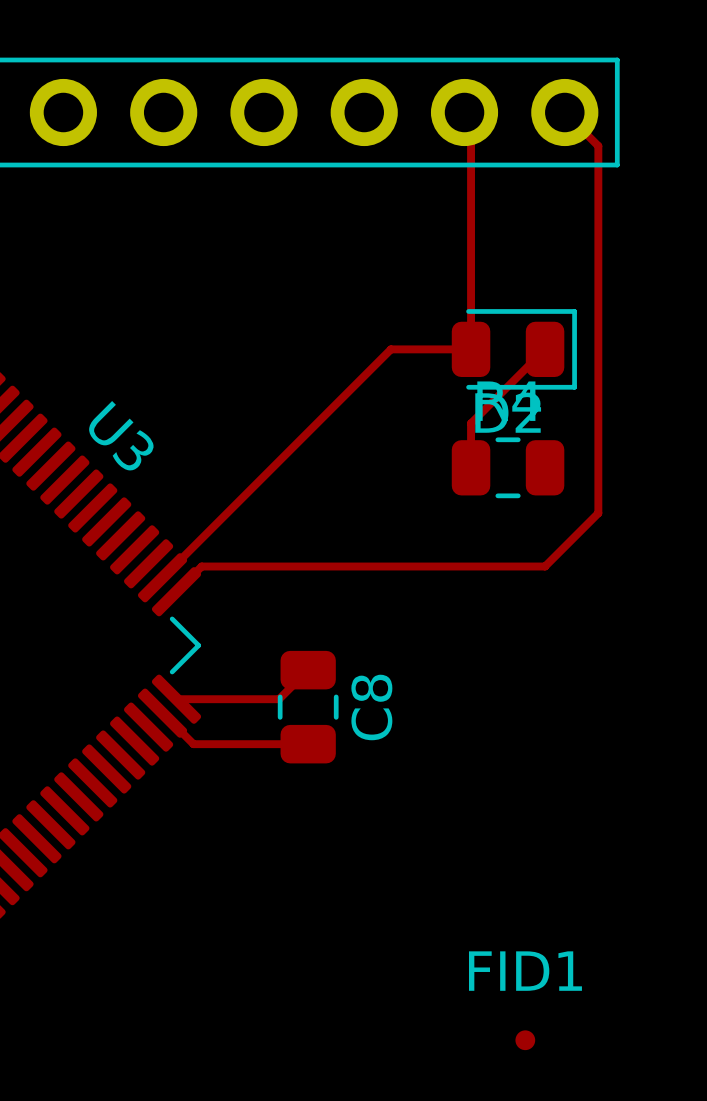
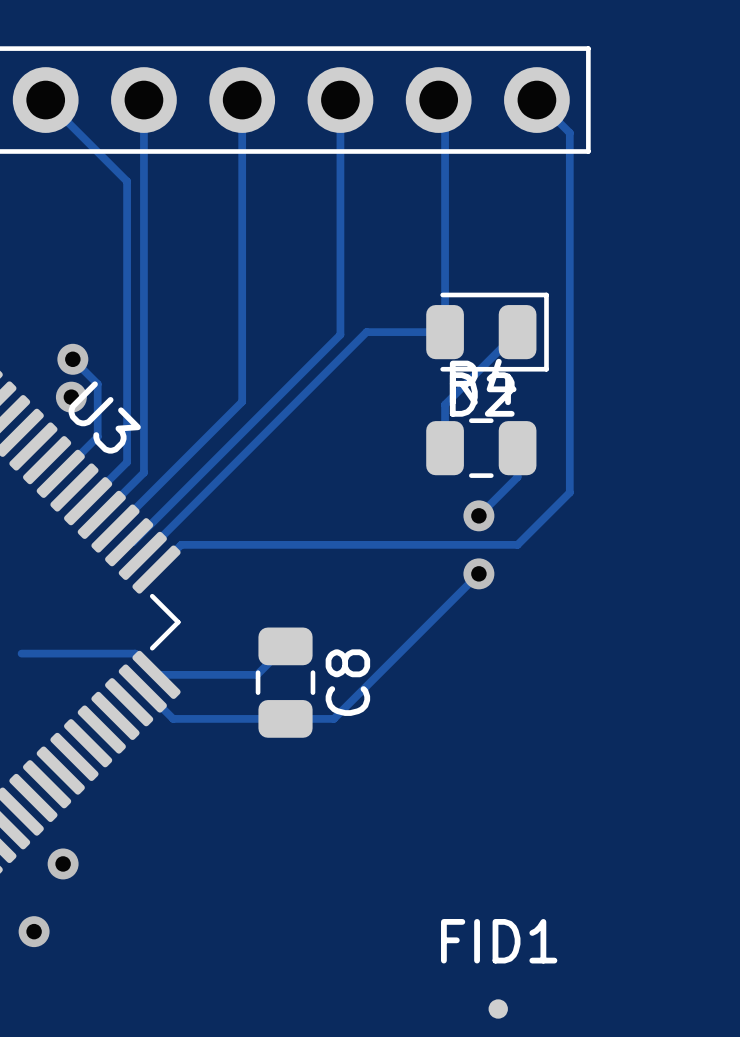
track: none -> (45, 100) (127, 181) (127, 462) (88, 501)
track: none -> (143, 100) (143, 472) (101, 514)
track: none -> (242, 100) (242, 401) (115, 528)
track: none -> (340, 100) (340, 334) (132, 542) (129, 542)
track: none -> (72, 359) (97, 384) (97, 436) (60, 473)
via: none -> (72, 359)
via: none -> (71, 397)
track: none -> (517, 448) (517, 477) (478, 515)
via: none -> (478, 515)
track: none -> (478, 573) (333, 718) (285, 718)
via: none -> (478, 573)
track: none -> (21, 653) (135, 653) (156, 674)
via: none -> (63, 863)
via: none -> (34, 931)

